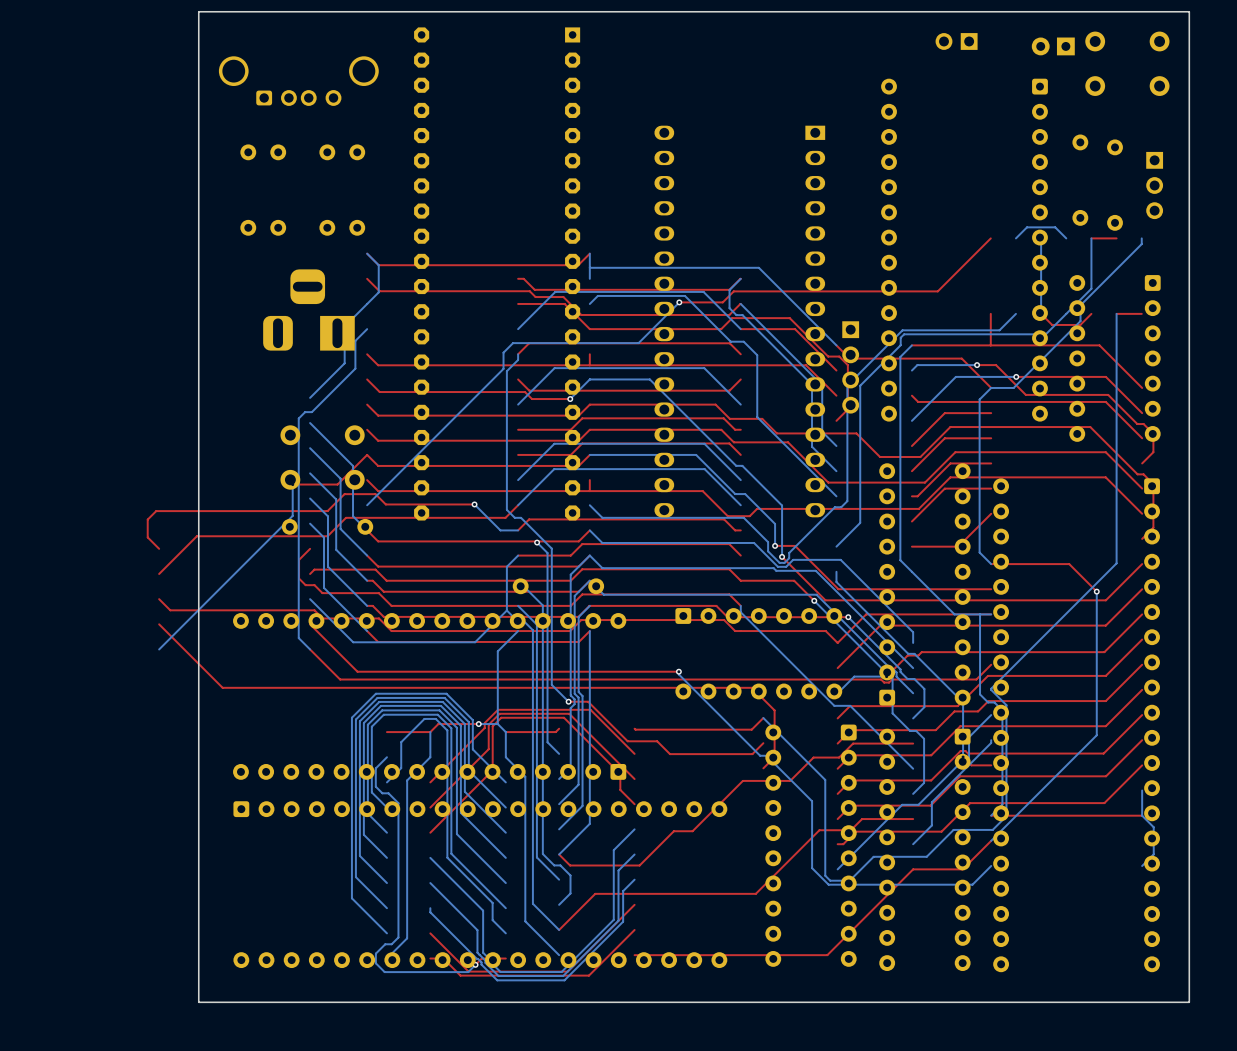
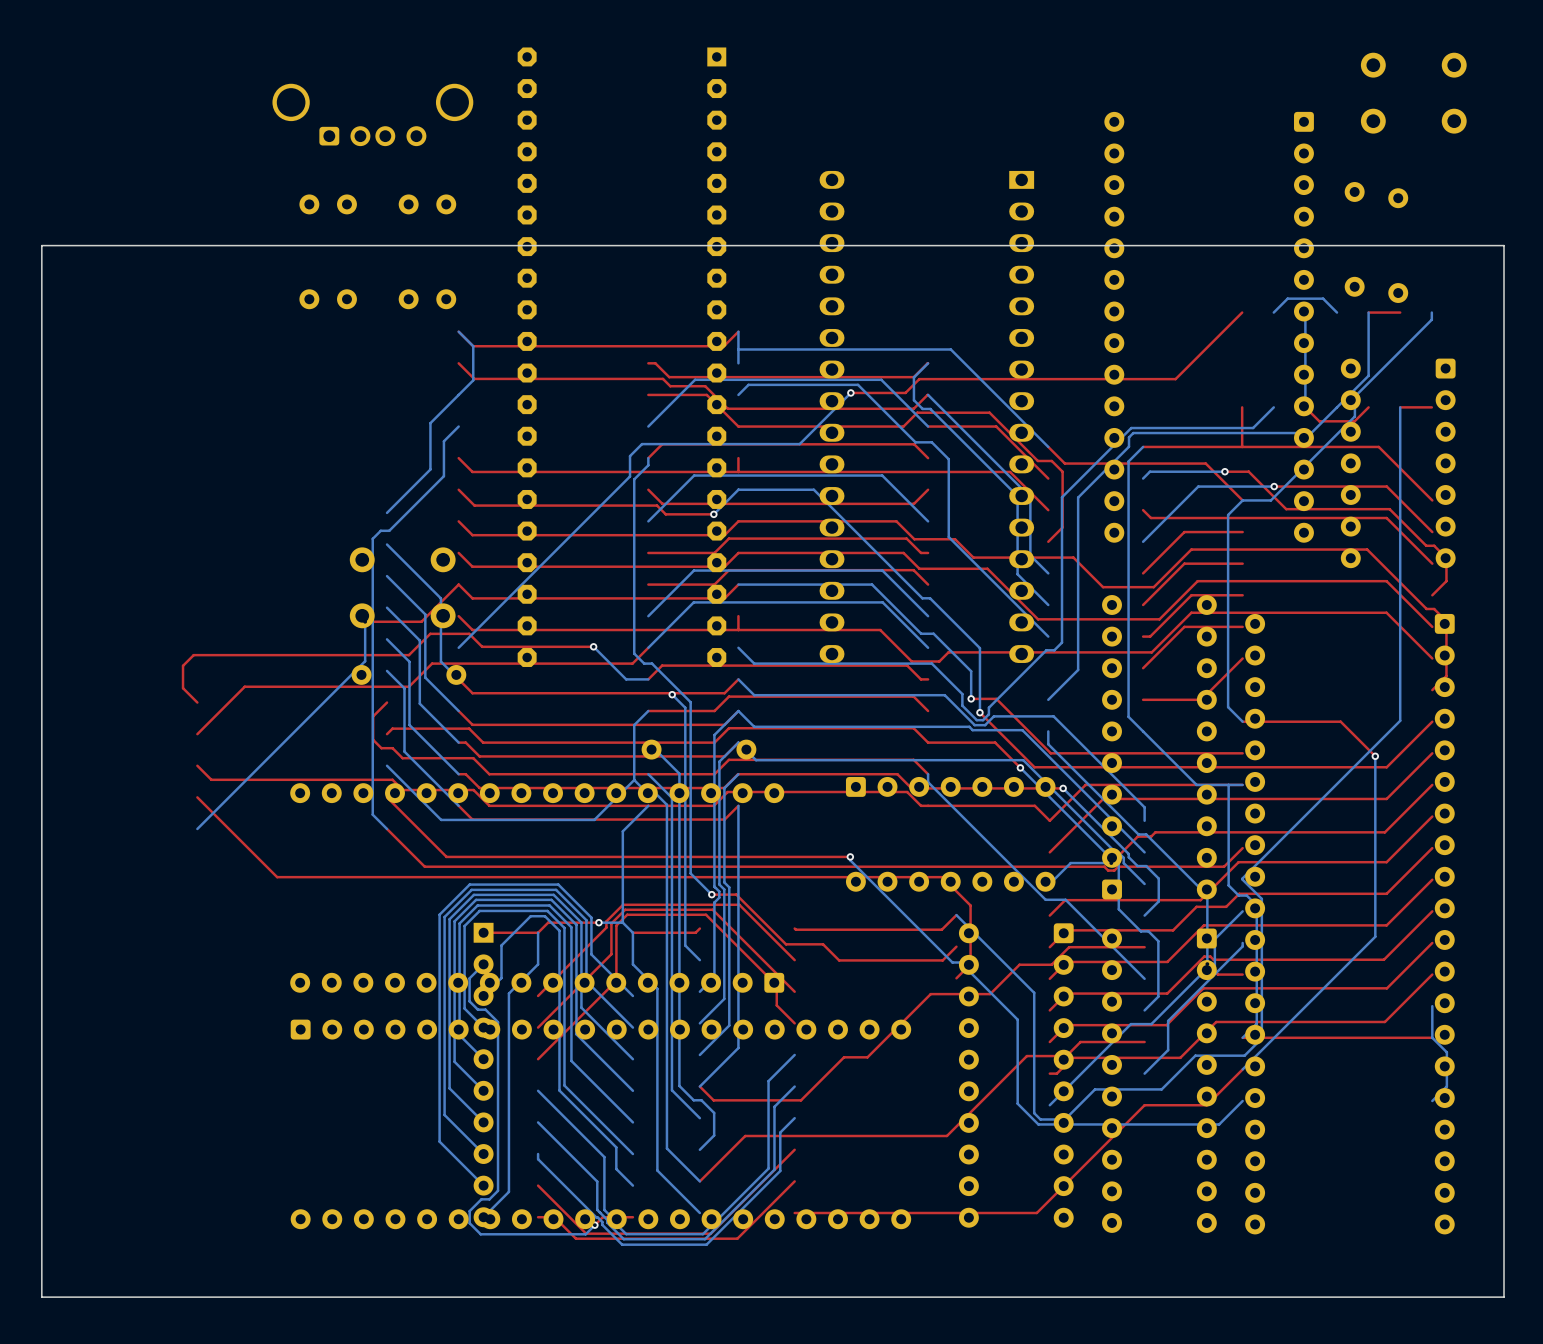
board edge: (1189, 11) (198, 11) (198, 1002) (1189, 1002) (1189, 11) -> (1504, 245) (1504, 1297) (41, 1297) (41, 245) (1504, 245)
part: (956, 41) -> none
part: (1053, 46) -> none
part: (1154, 185) -> none
part: (308, 309) -> none
part: (850, 367) -> none
part: none -> (483, 1075)

